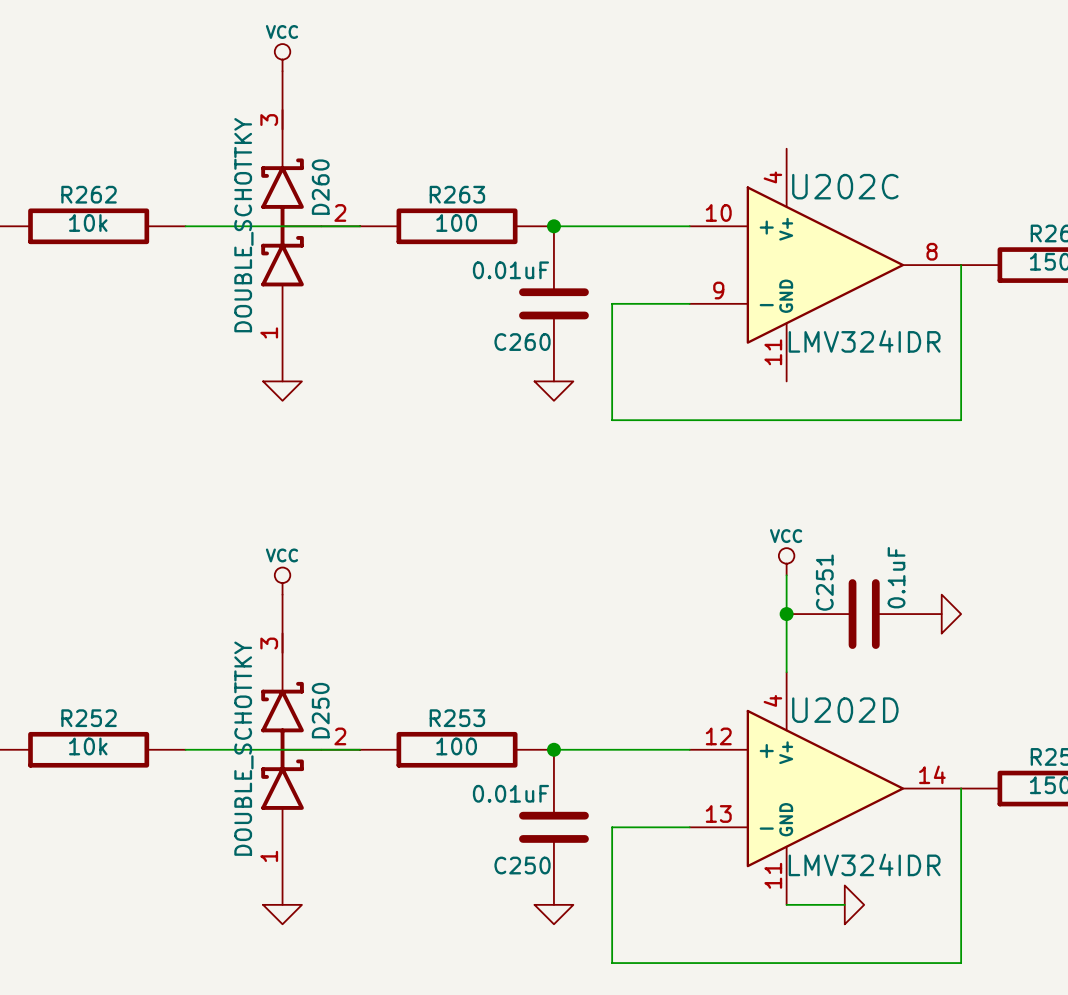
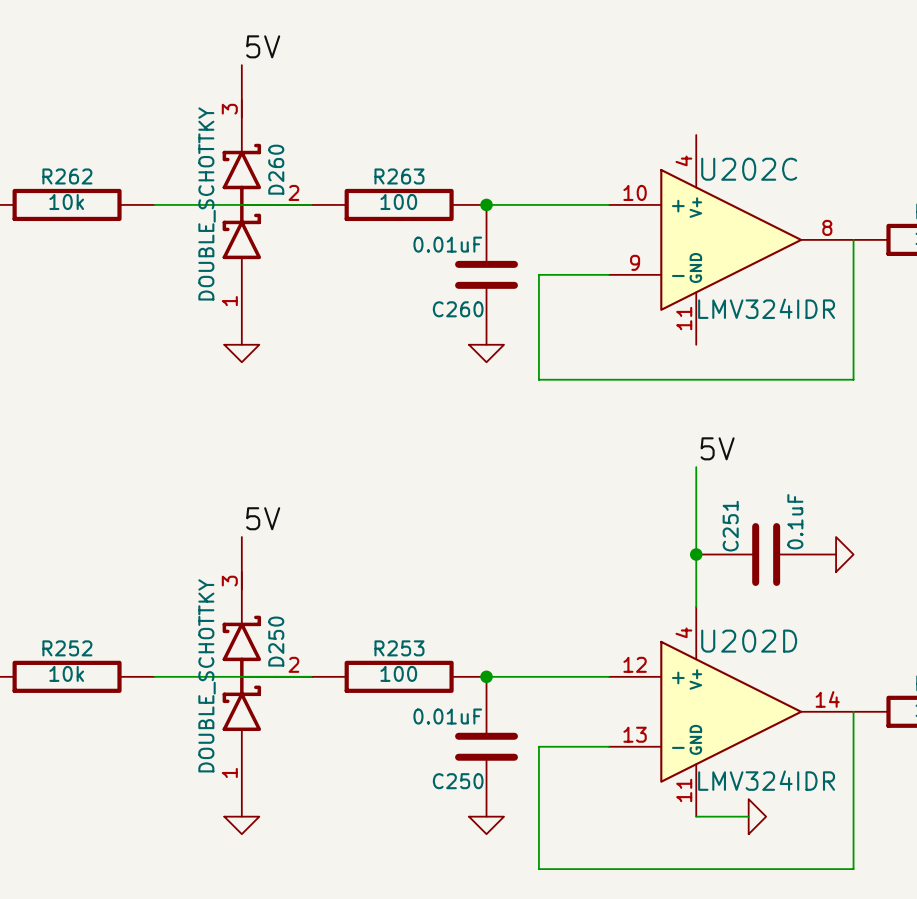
label: none -> 5V (263, 46)
power symbol: VCC (282, 57) -> none
label: none -> 5V (717, 448)
wire: none -> (696, 467) (696, 519)
power symbol: VCC (786, 561) -> none
label: none -> 5V (263, 518)
power symbol: VCC (282, 581) -> none

